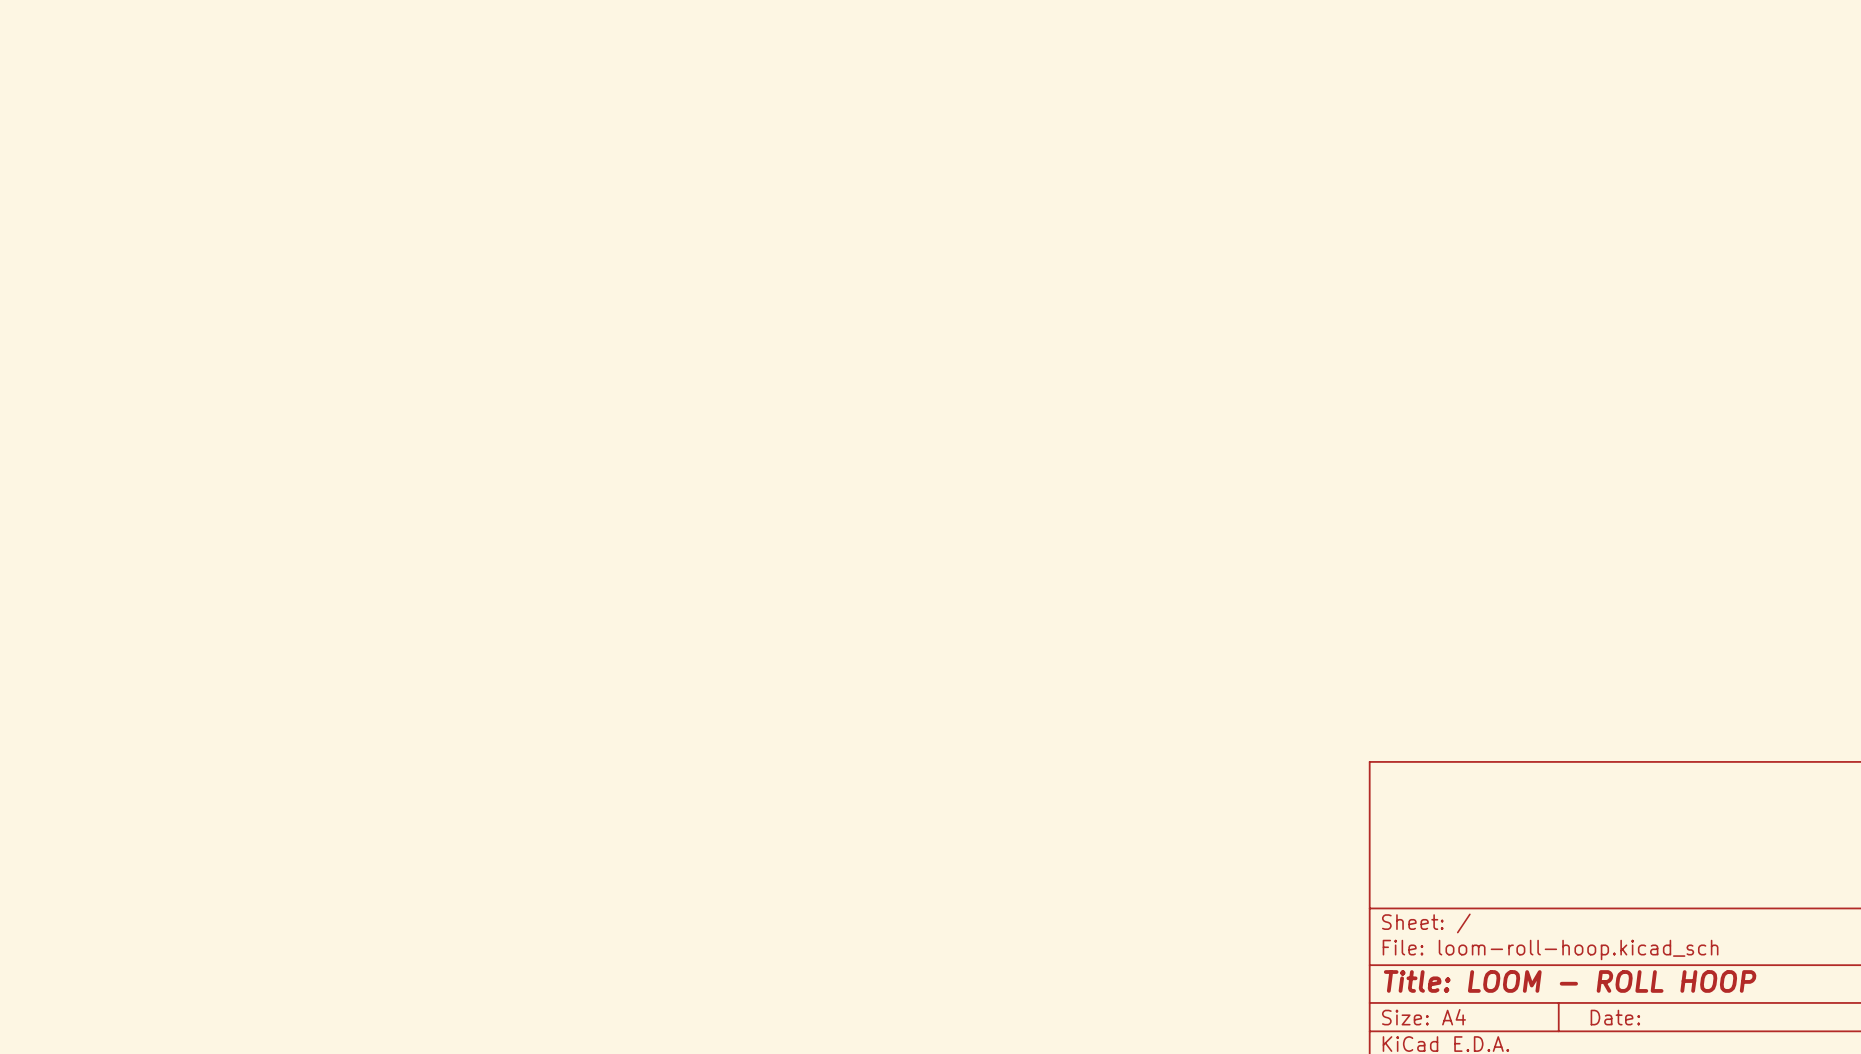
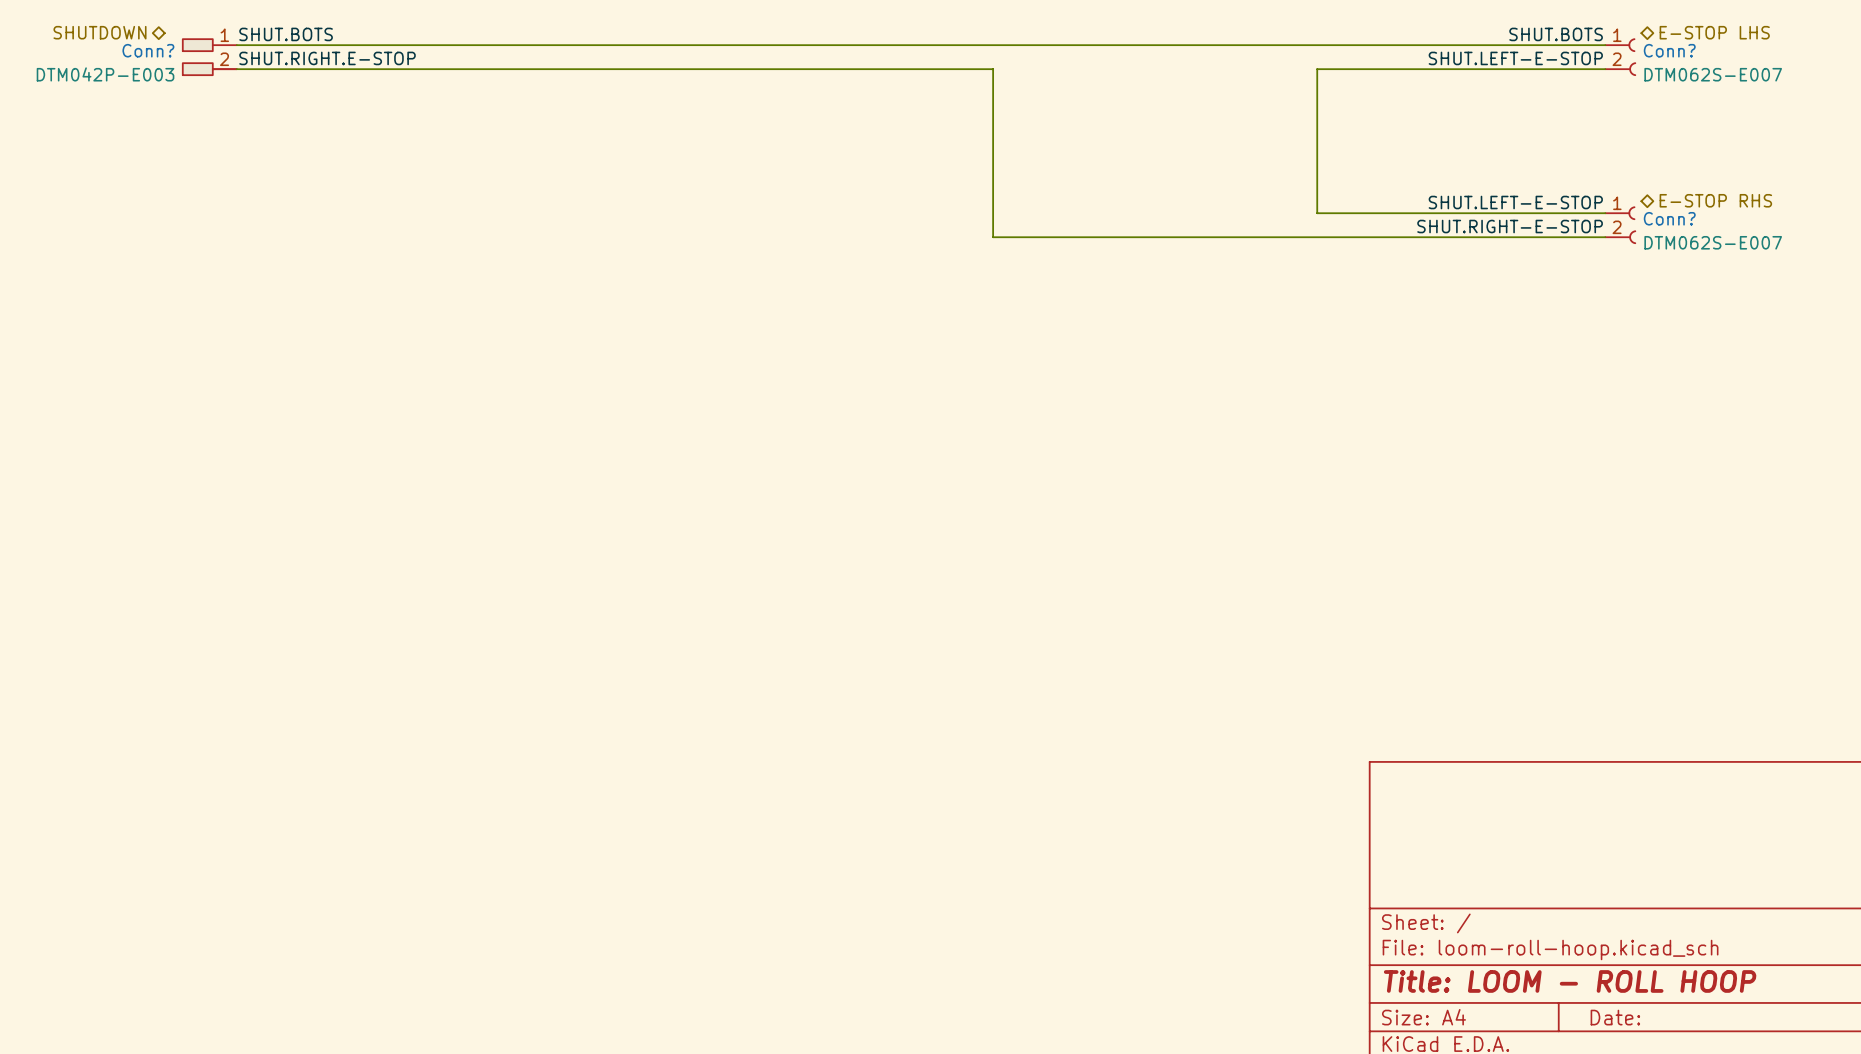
hierarchical label: none -> SHUTDOWN (100, 32)
hierarchical label: none -> E-STOP LHS (1714, 32)
label: none -> SHUT.BOTS (286, 34)
label: none -> SHUT.BOTS (1556, 34)
wire: none -> (236, 45) (1605, 45)
Conn?: none -> (209, 57)
Conn?: none -> (1620, 57)
label: none -> SHUT.RIGHT.E-STOP (327, 58)
label: none -> SHUT.LEFT-E-STOP (1515, 58)
wire: none -> (236, 69) (993, 69) (993, 237) (1605, 237)
wire: none -> (1605, 69) (1317, 69) (1317, 213) (1605, 213)
hierarchical label: none -> E-STOP RHS (1715, 200)
label: none -> SHUT.LEFT-E-STOP (1515, 202)
Conn?: none -> (1620, 225)
label: none -> SHUT.RIGHT-E-STOP (1510, 226)

